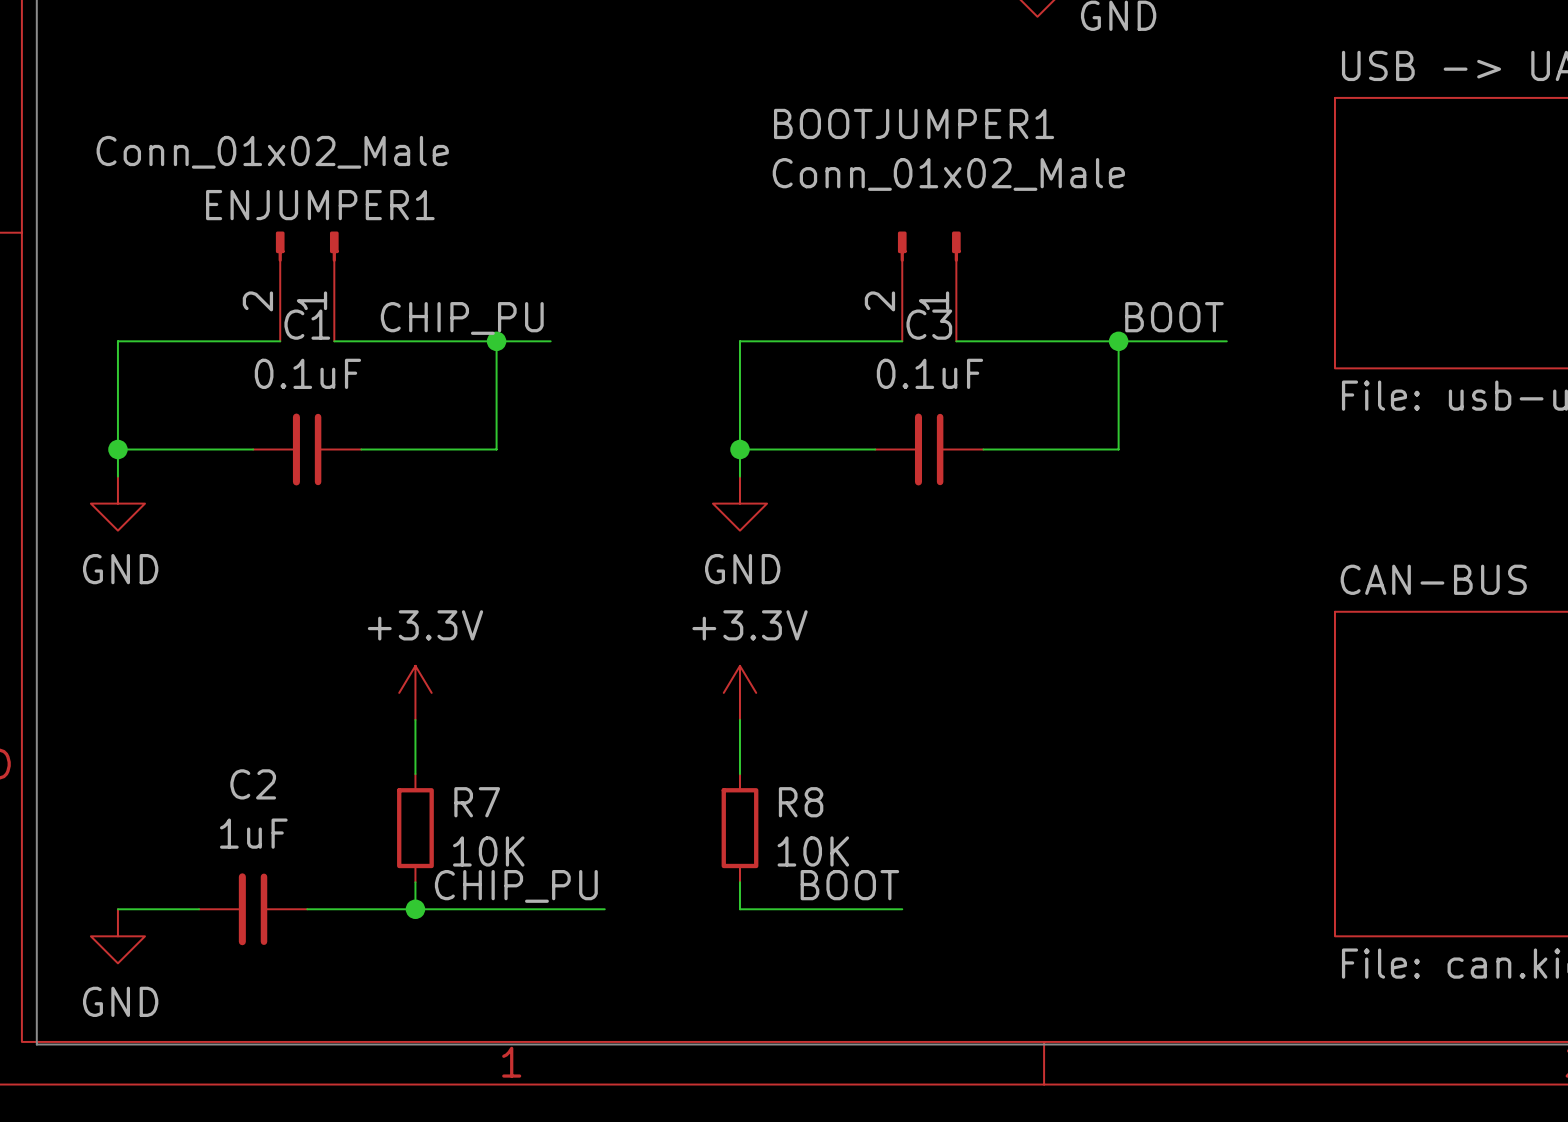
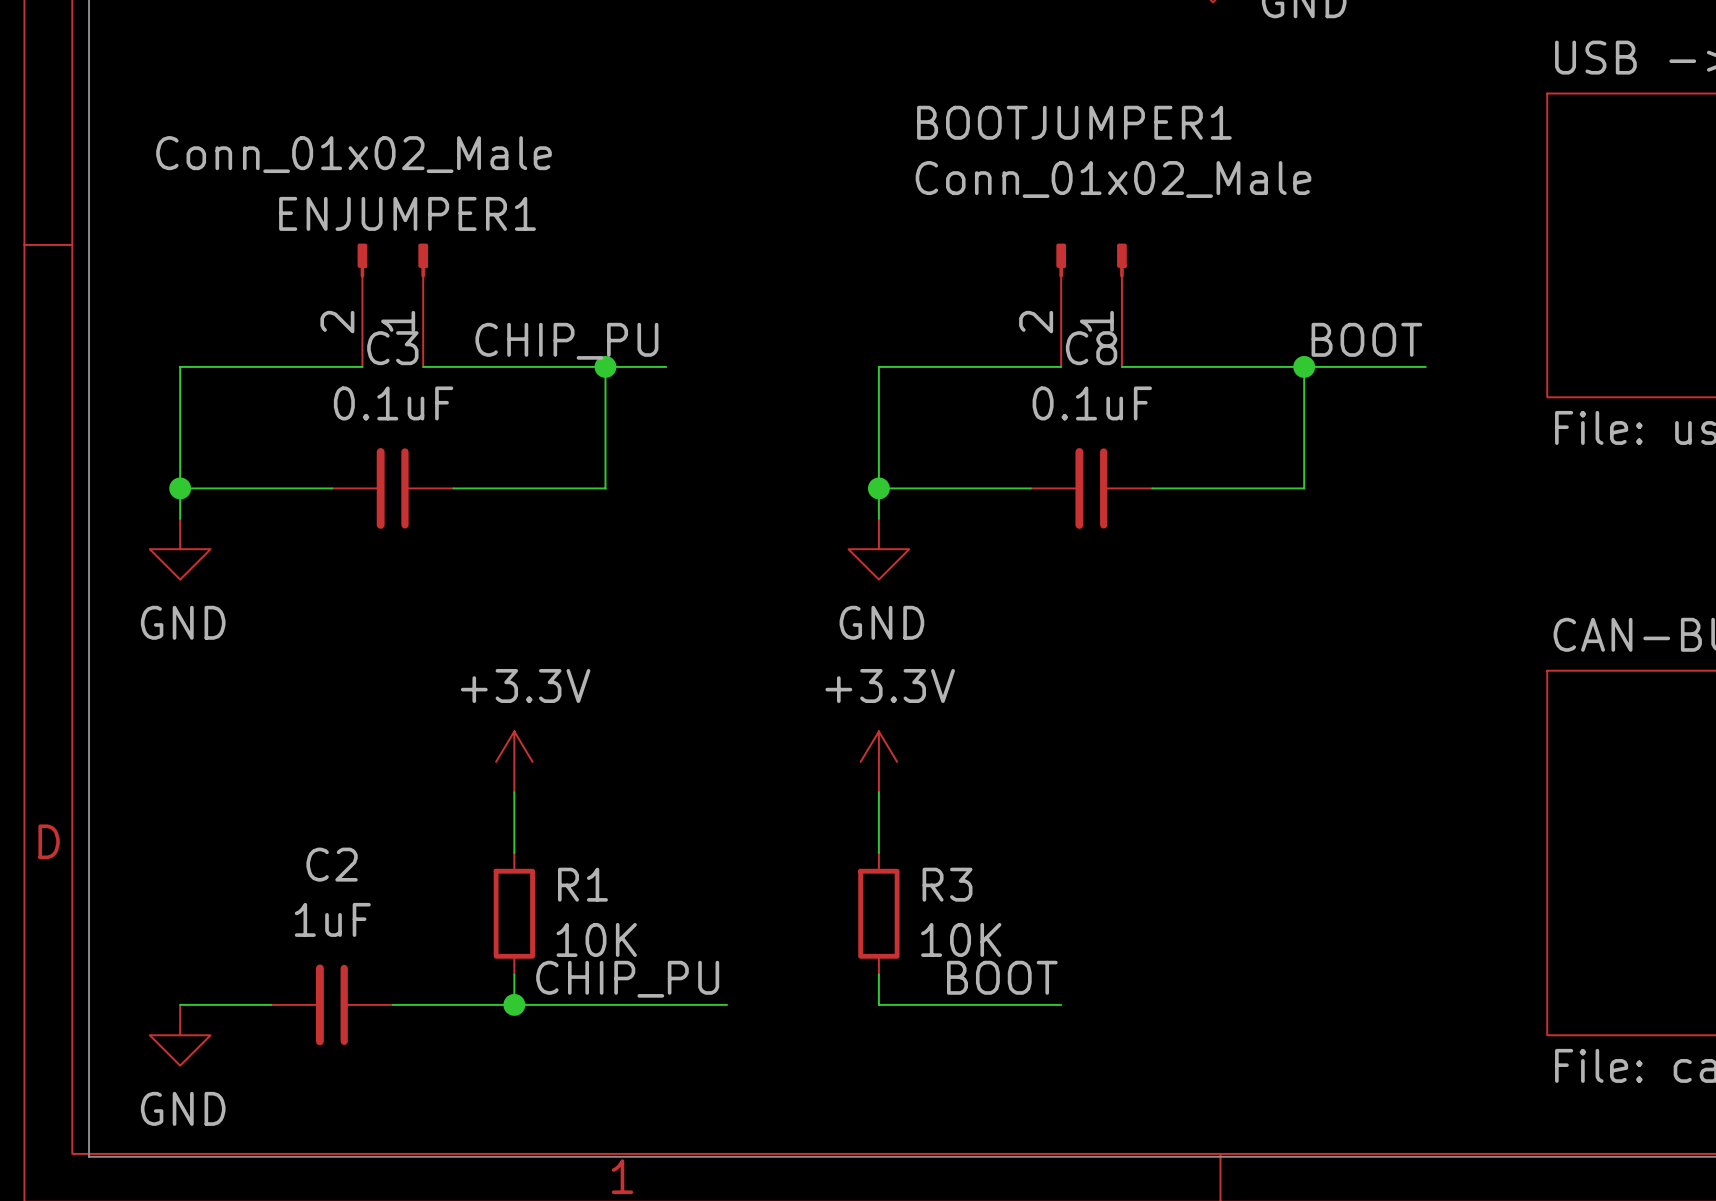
C1 name: C1 (307, 324) -> C3 (392, 348)
C3 name: C3 (929, 324) -> C8 (1091, 348)
R7 name: R7 (477, 802) -> R1 (582, 884)
R8 name: R8 (801, 802) -> R3 (947, 884)

